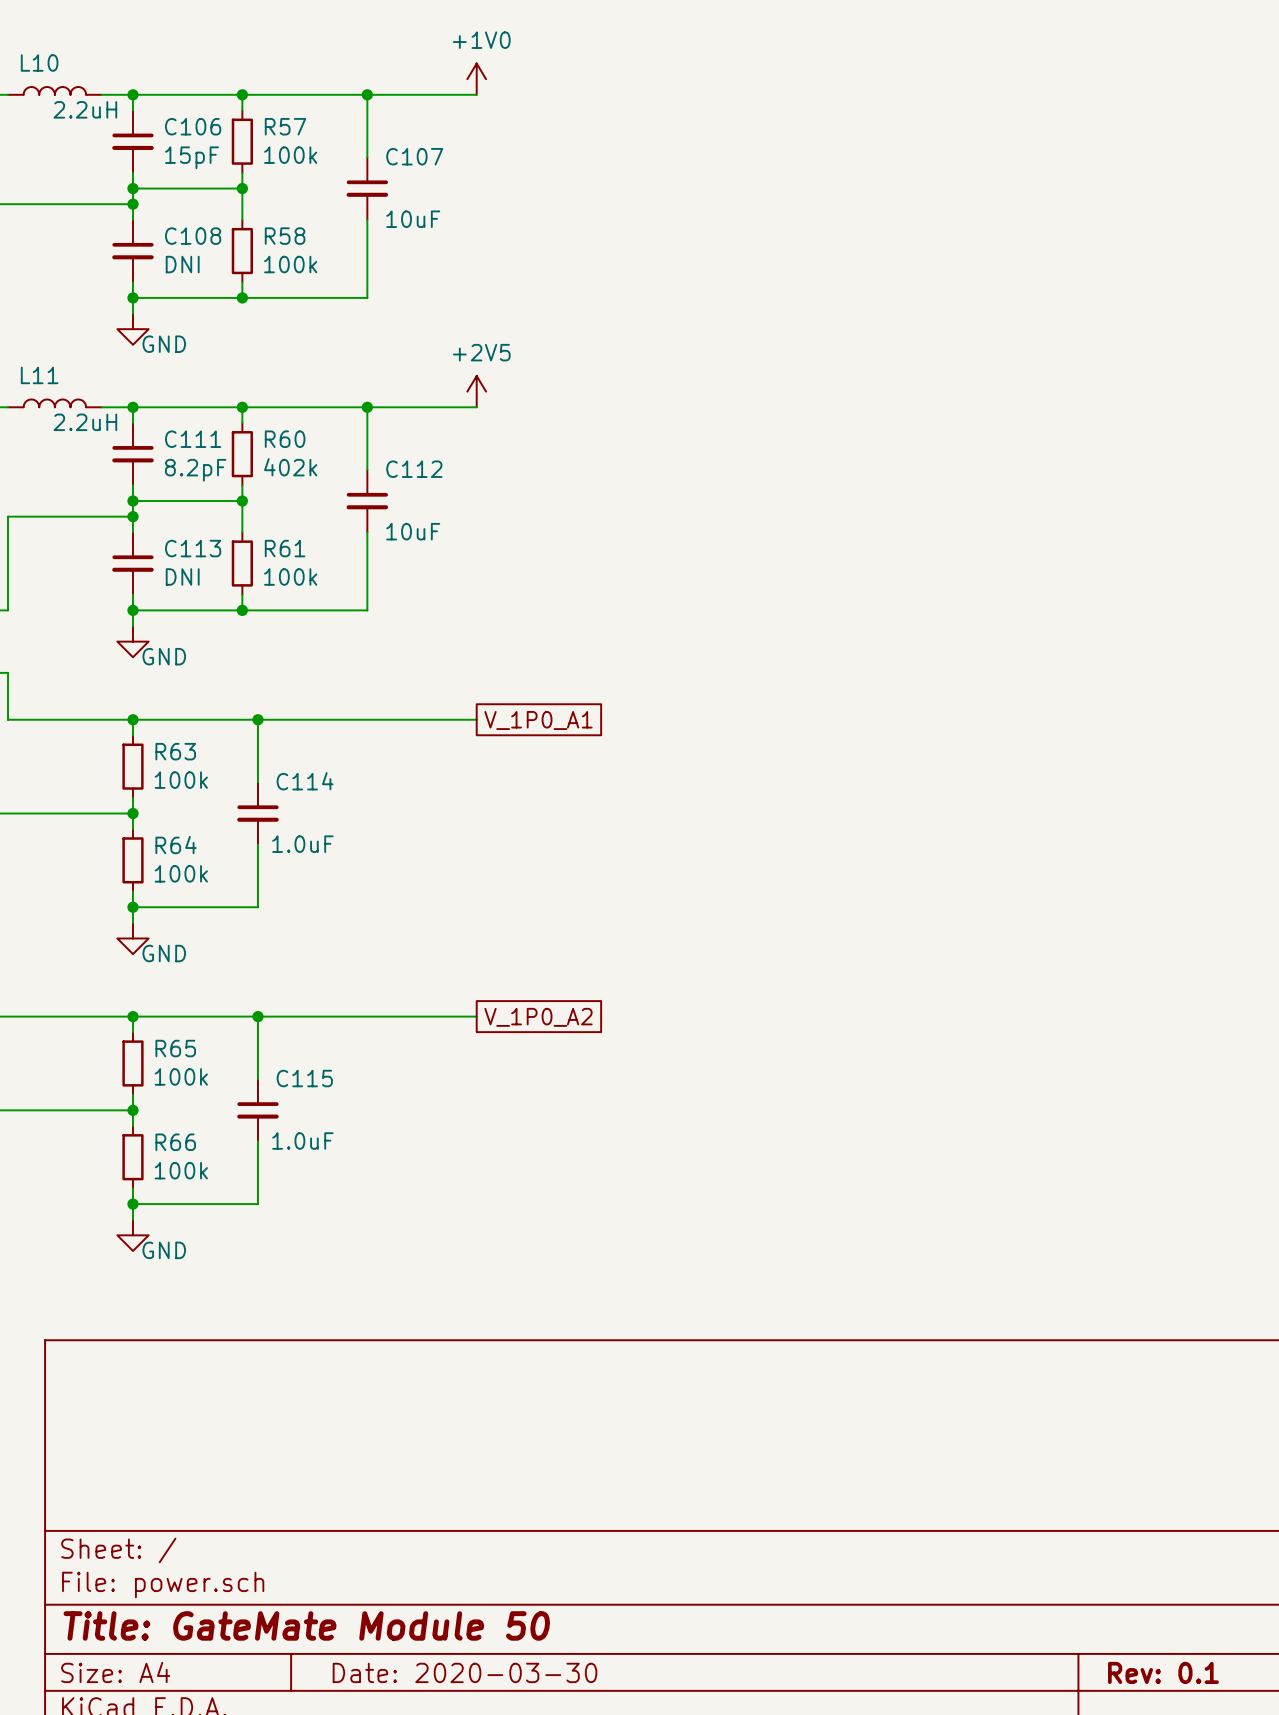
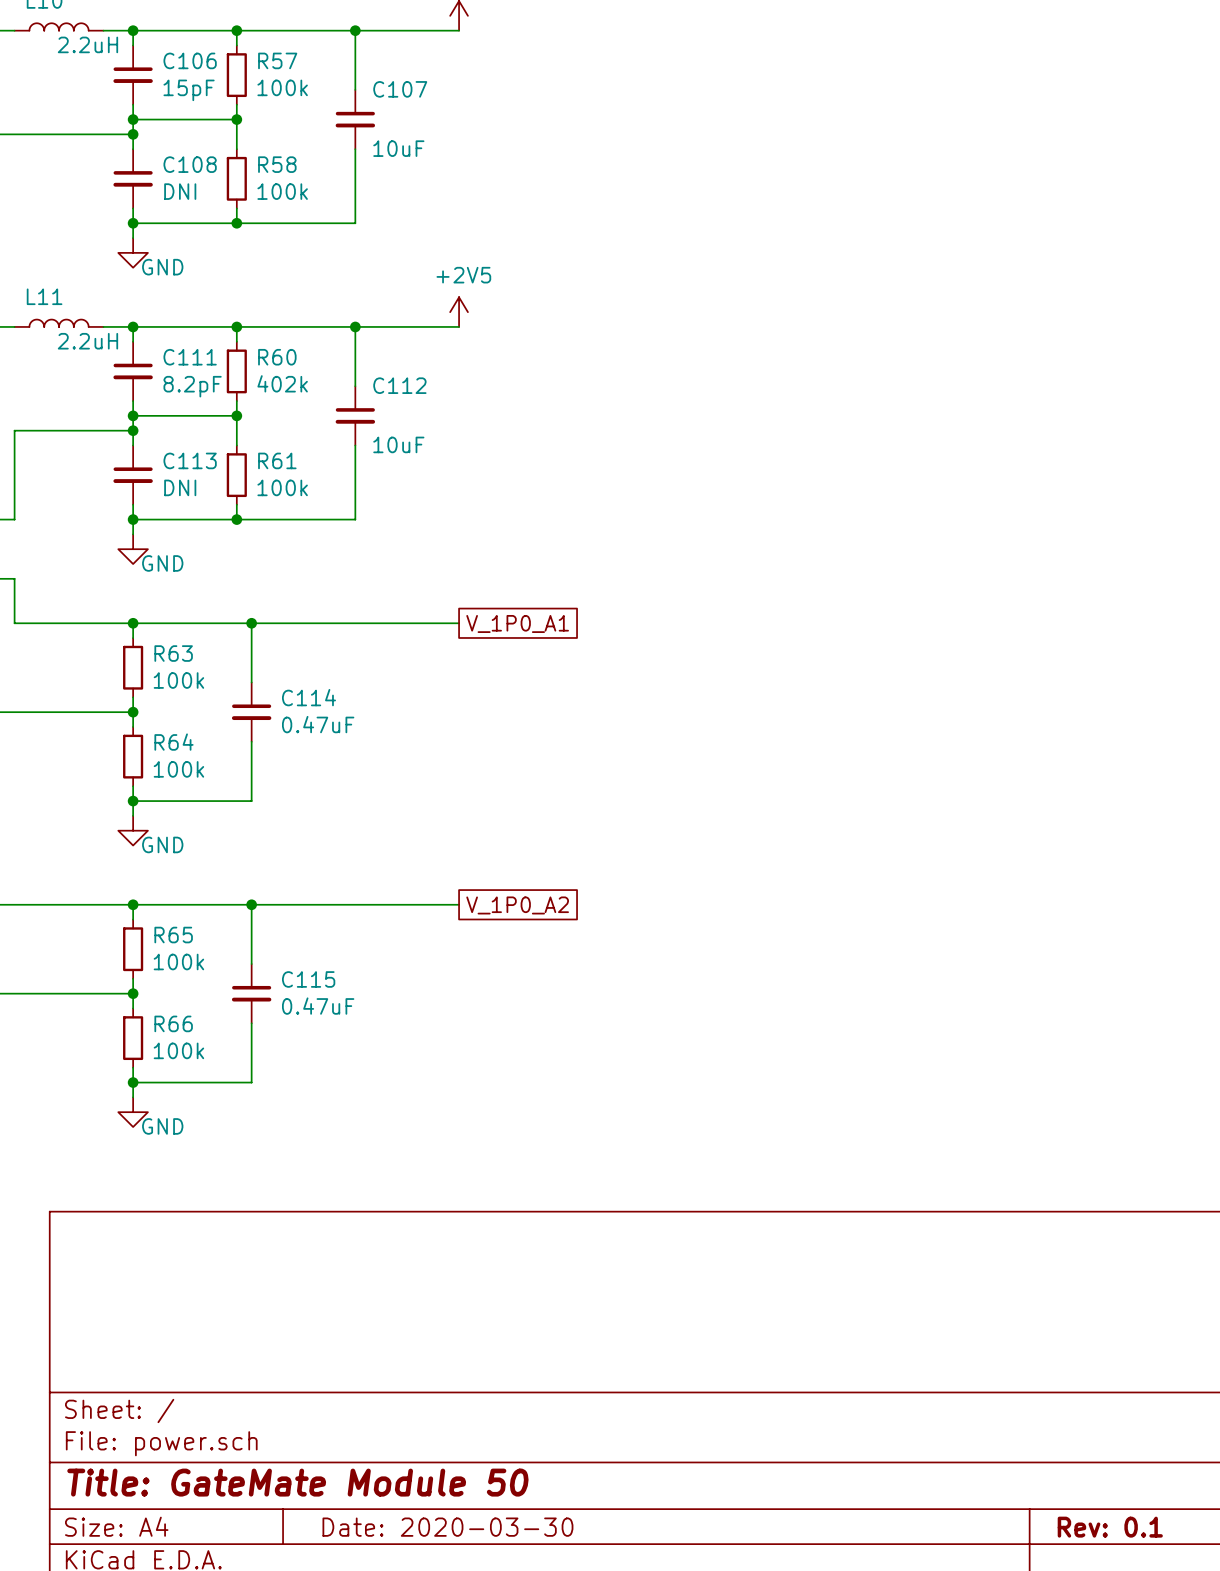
C114 name position: C114 (305, 781) -> C114 (308, 697)
C114 value: 1.0uF (302, 844) -> 0.47uF (318, 724)
C115 name position: C115 (304, 1078) -> C115 (308, 979)
C115 value: 1.0uF (302, 1141) -> 0.47uF (318, 1006)

